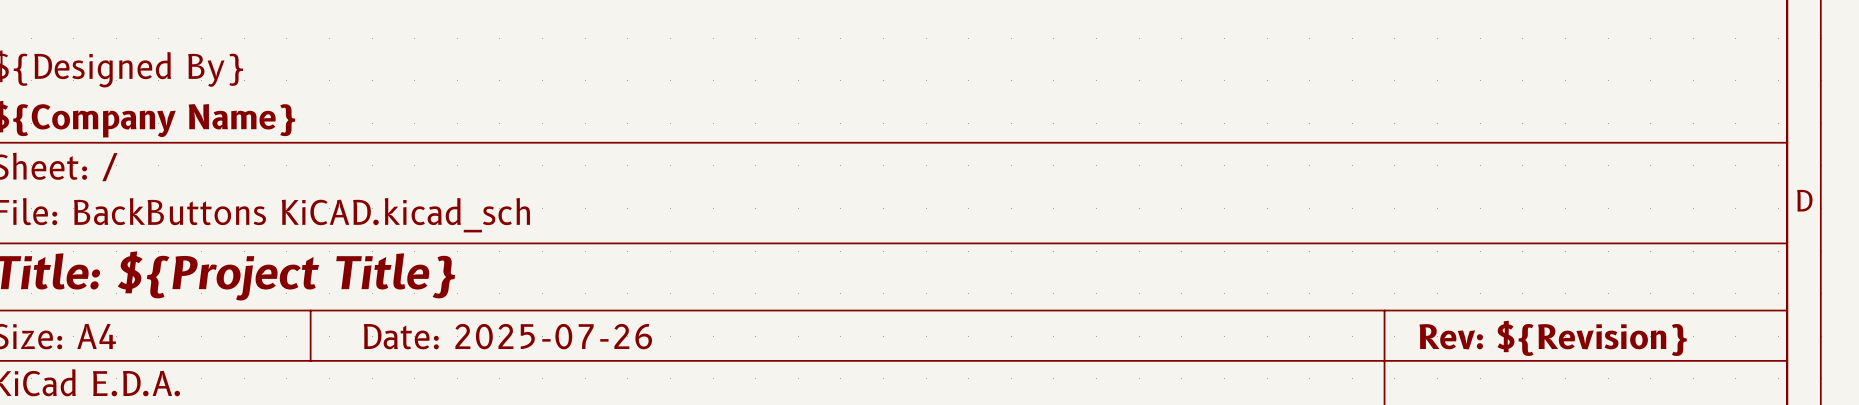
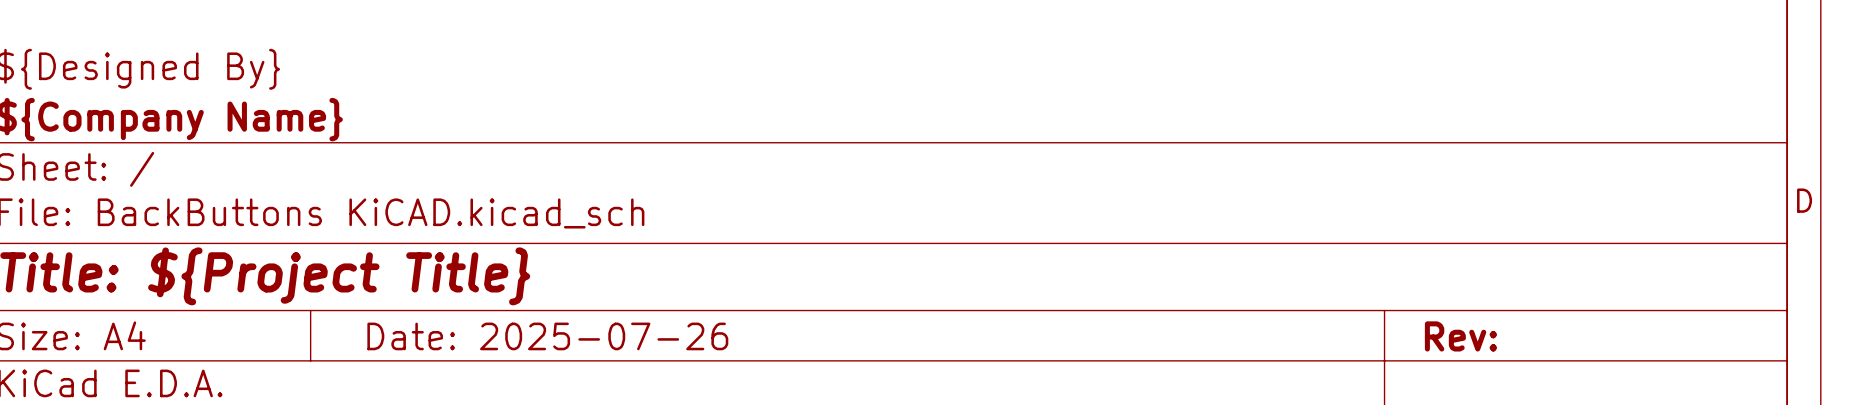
title block: Rev: ${Revision} (1553, 338) -> Rev: (1460, 336)

